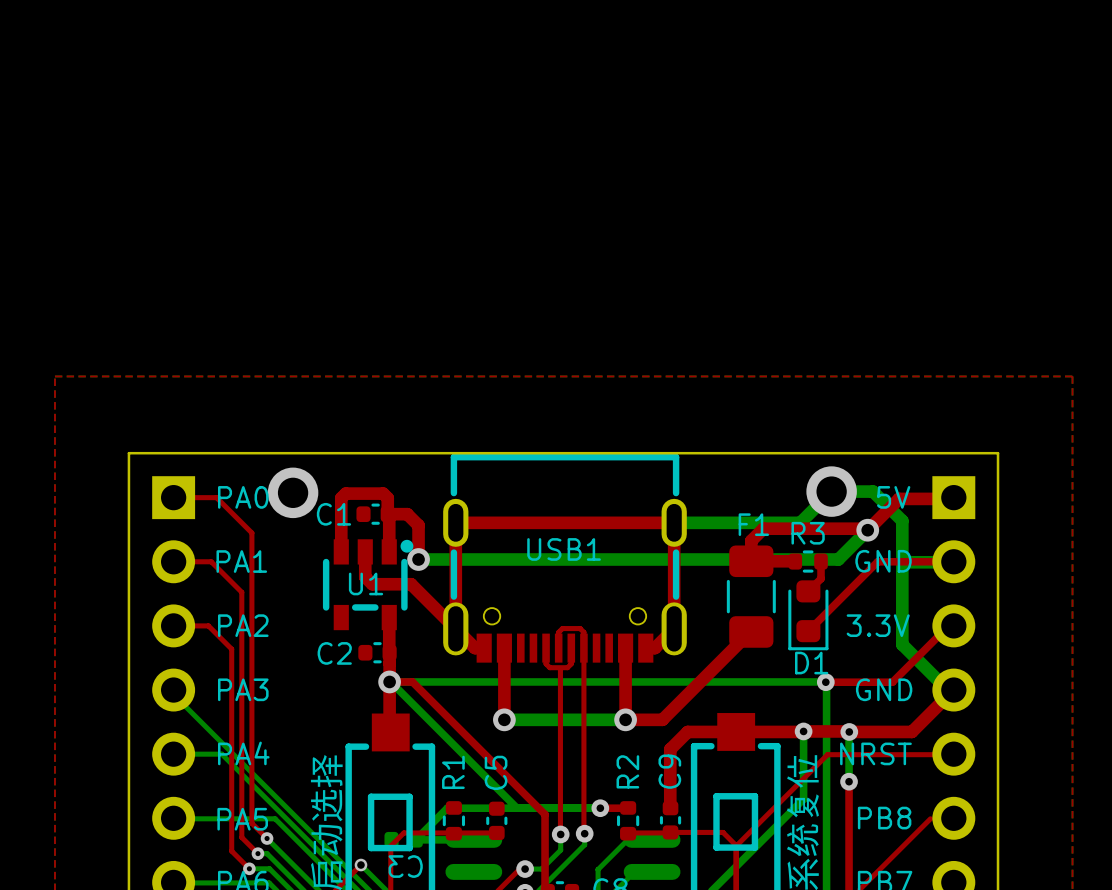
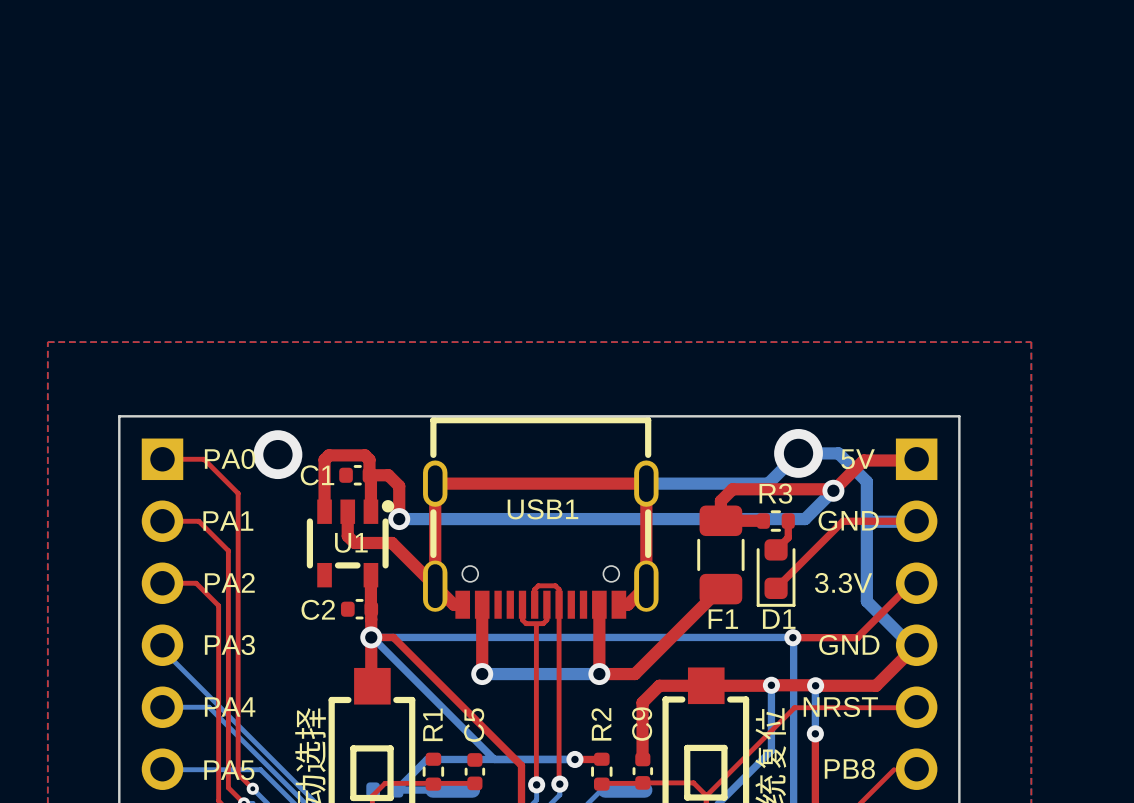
F1 name position: F1 (753, 524) -> F1 (723, 619)

